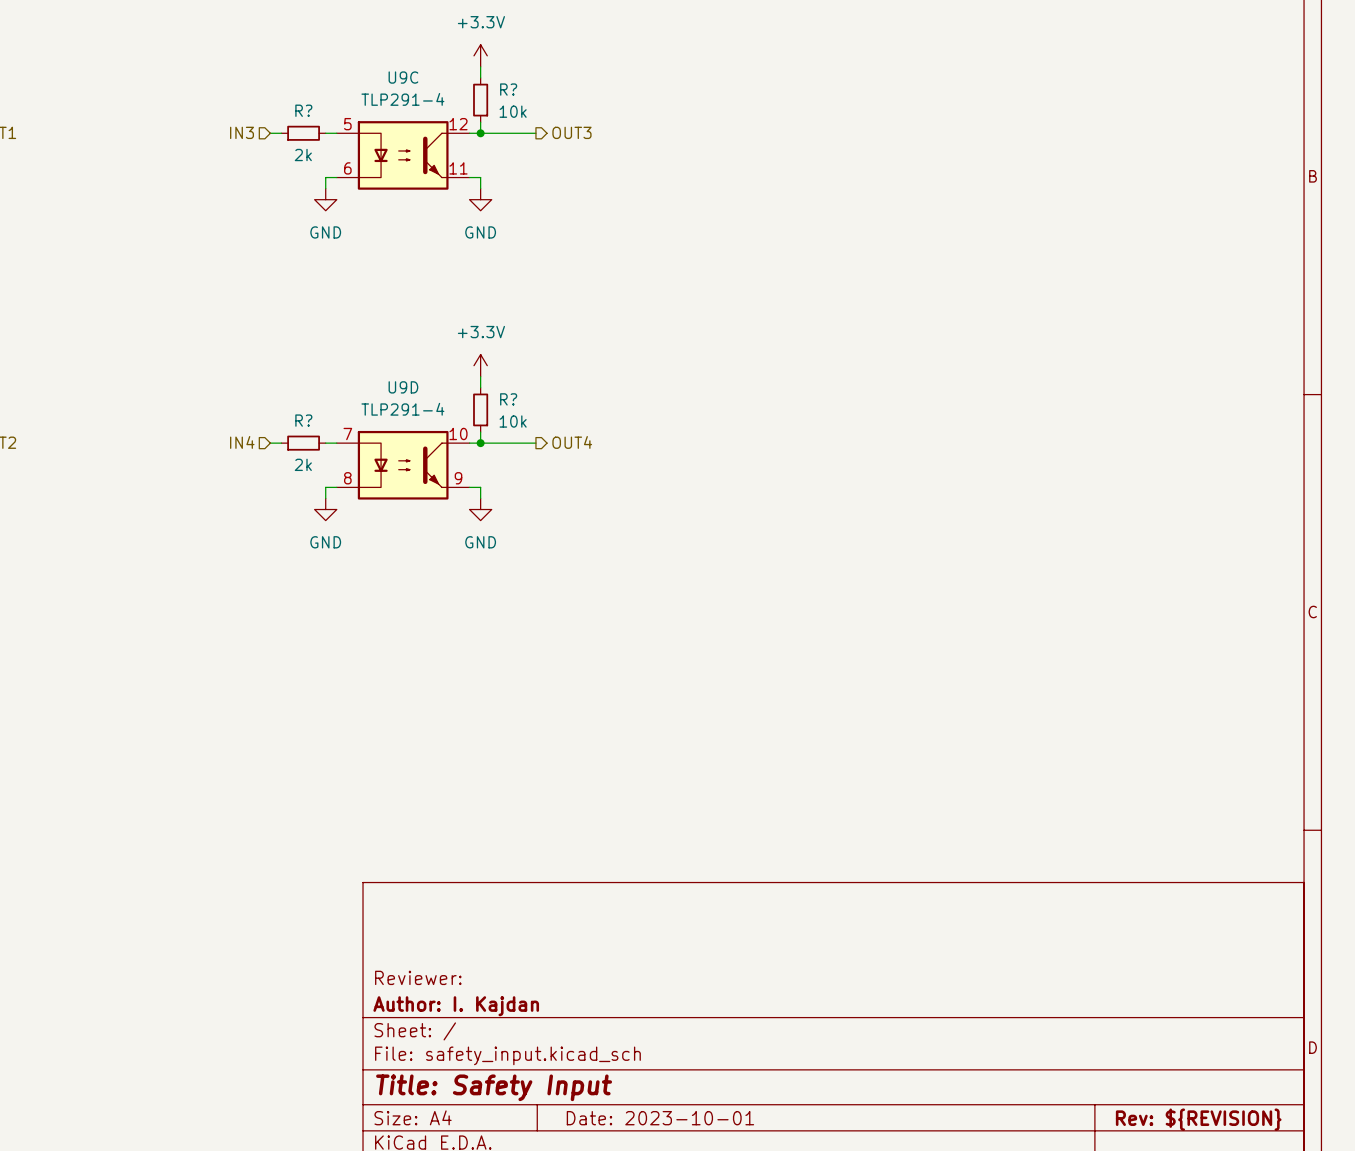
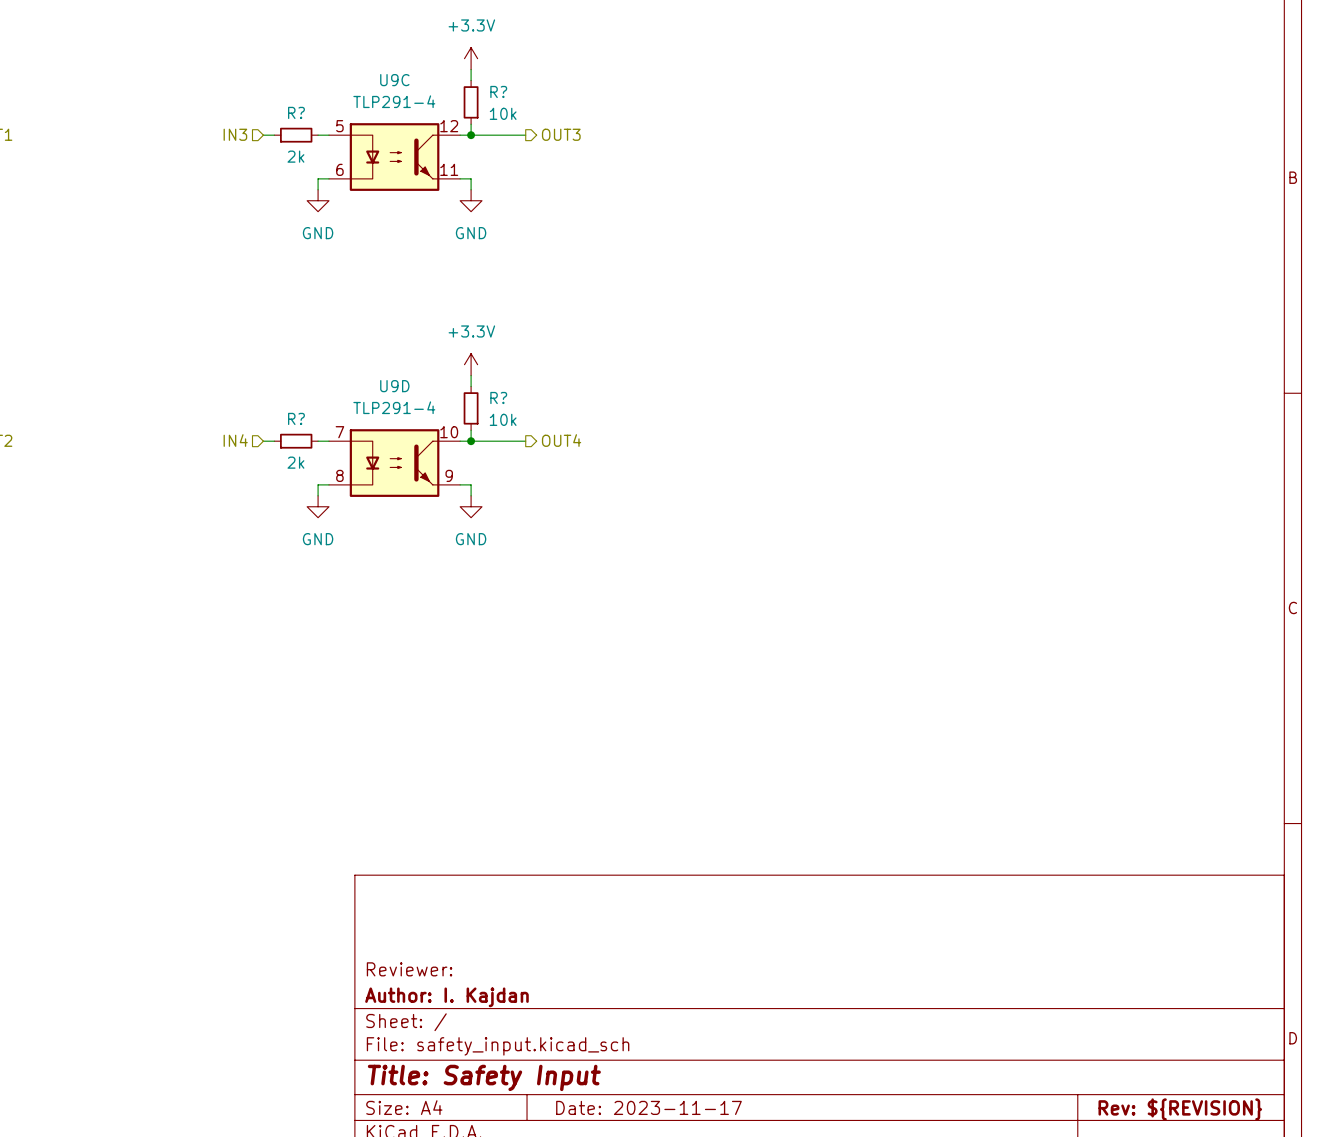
title block: Date: 2023-10-01 (660, 1118) -> Date: 2023-11-17 (648, 1107)

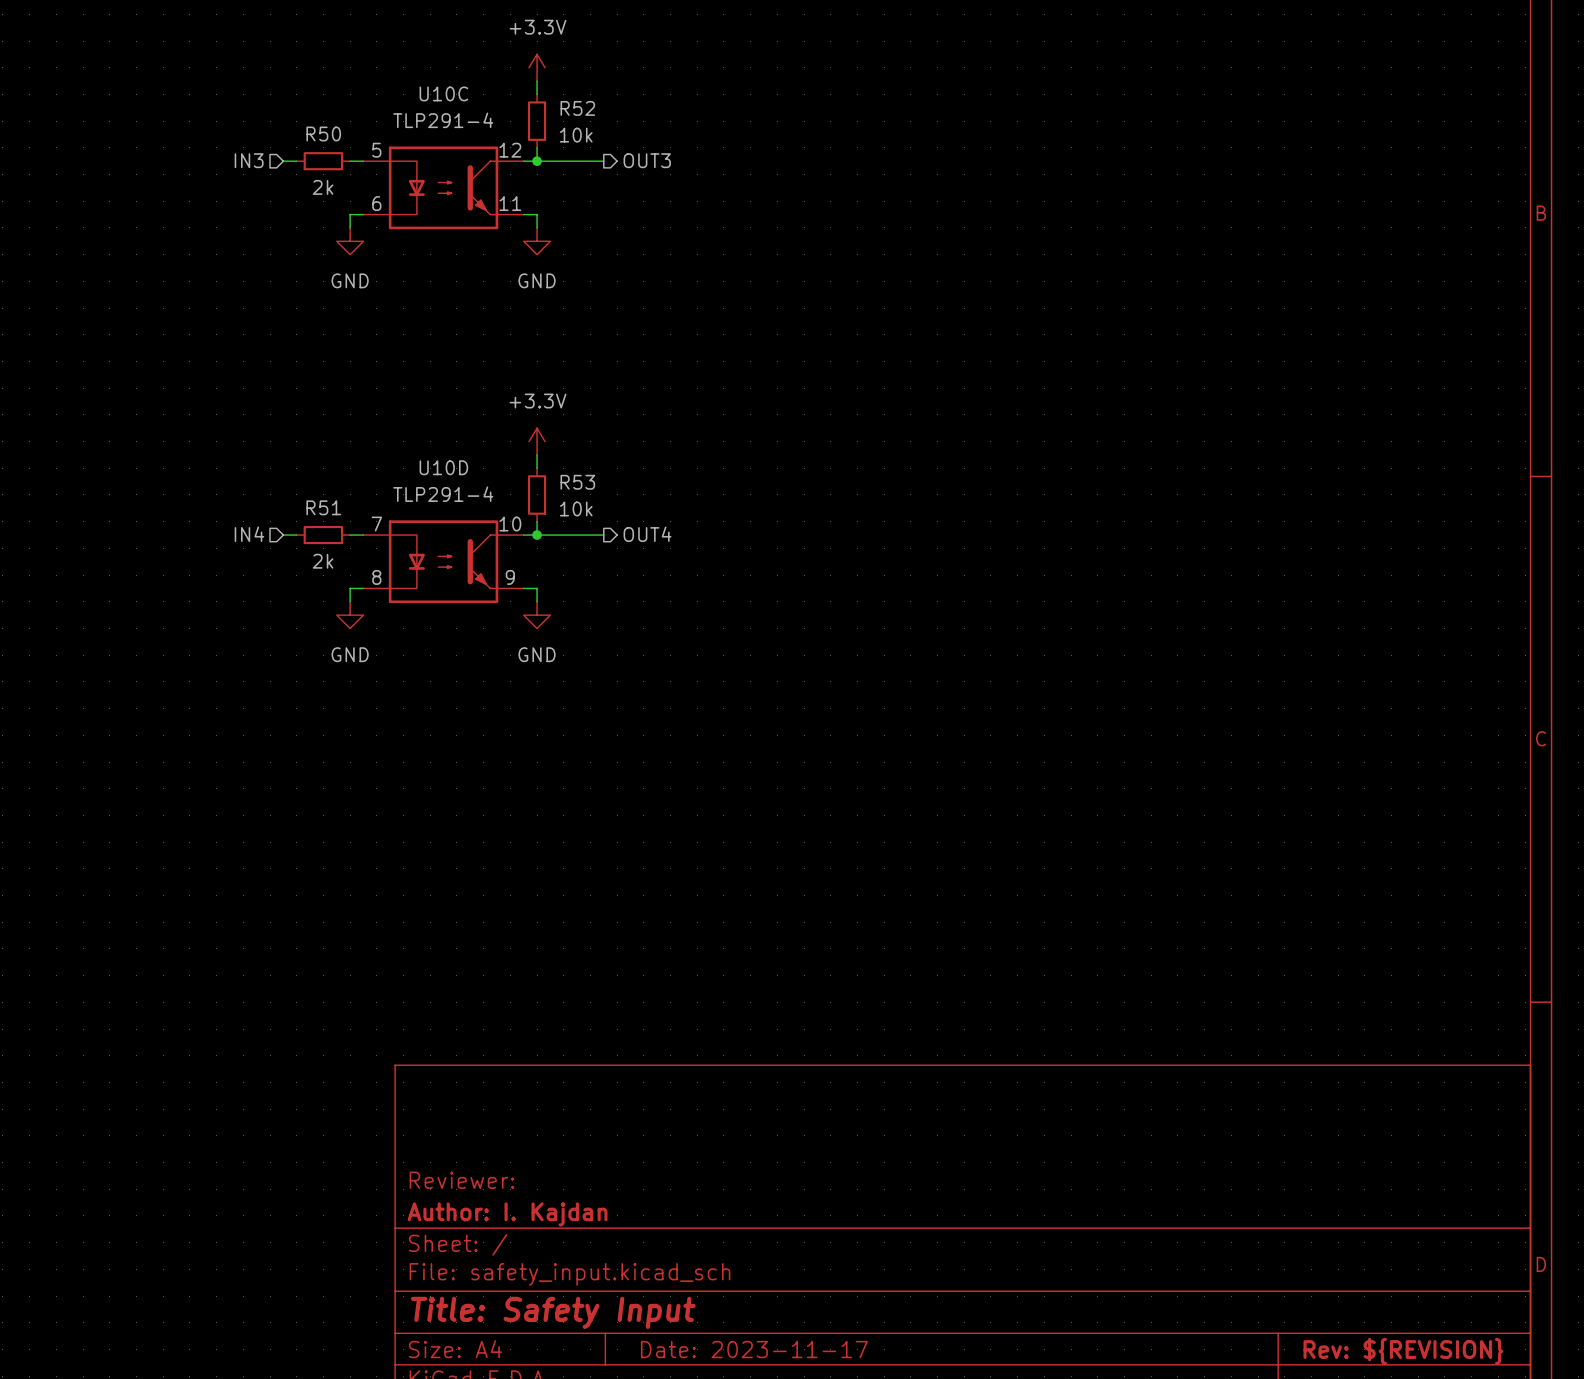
U9C name: U9C (394, 80) -> U10C (443, 93)
R? name: R? (498, 91) -> R52 (577, 108)
R? name: R? (296, 112) -> R50 (323, 133)
U9D name: U9D (394, 386) -> U10D (443, 467)
R? name: R? (498, 397) -> R53 (577, 482)
R? name: R? (296, 418) -> R51 (323, 507)

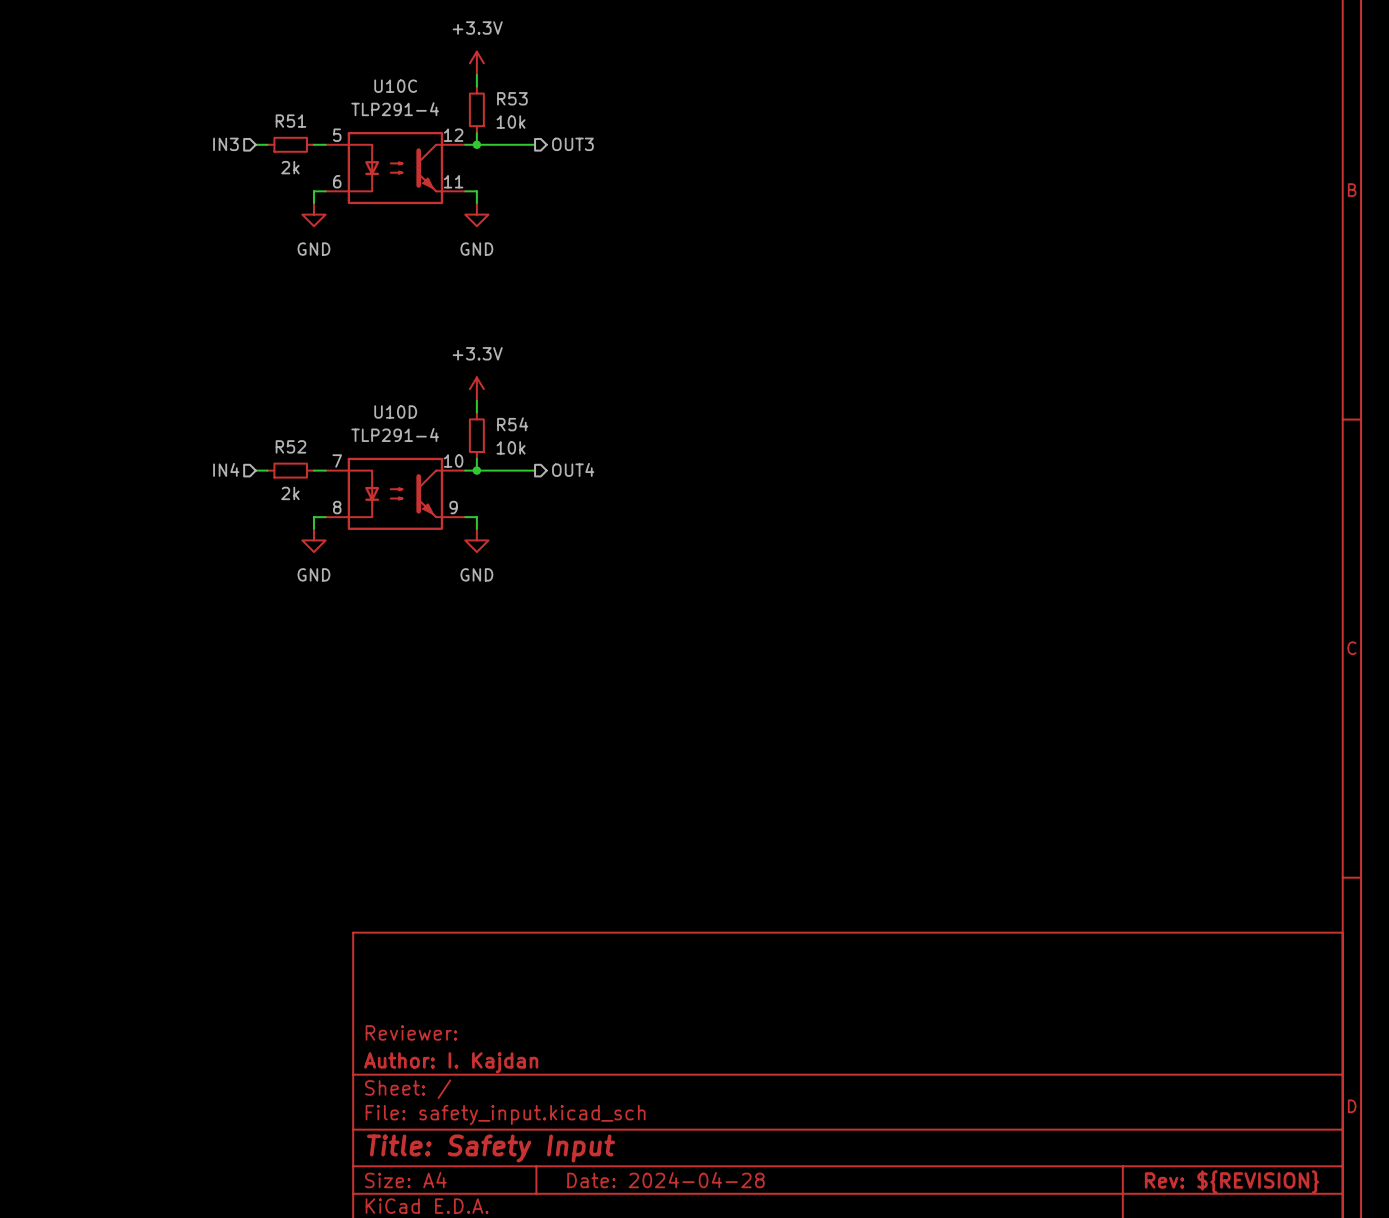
R52 name: R52 (577, 108) -> R53 (512, 98)
R50 name: R50 (323, 133) -> R51 (290, 121)
R53 name: R53 (577, 482) -> R54 (512, 424)
R51 name: R51 (323, 507) -> R52 (290, 446)
title block: Date: 2023-11-17 (754, 1349) -> Date: 2024-04-28 (665, 1180)

